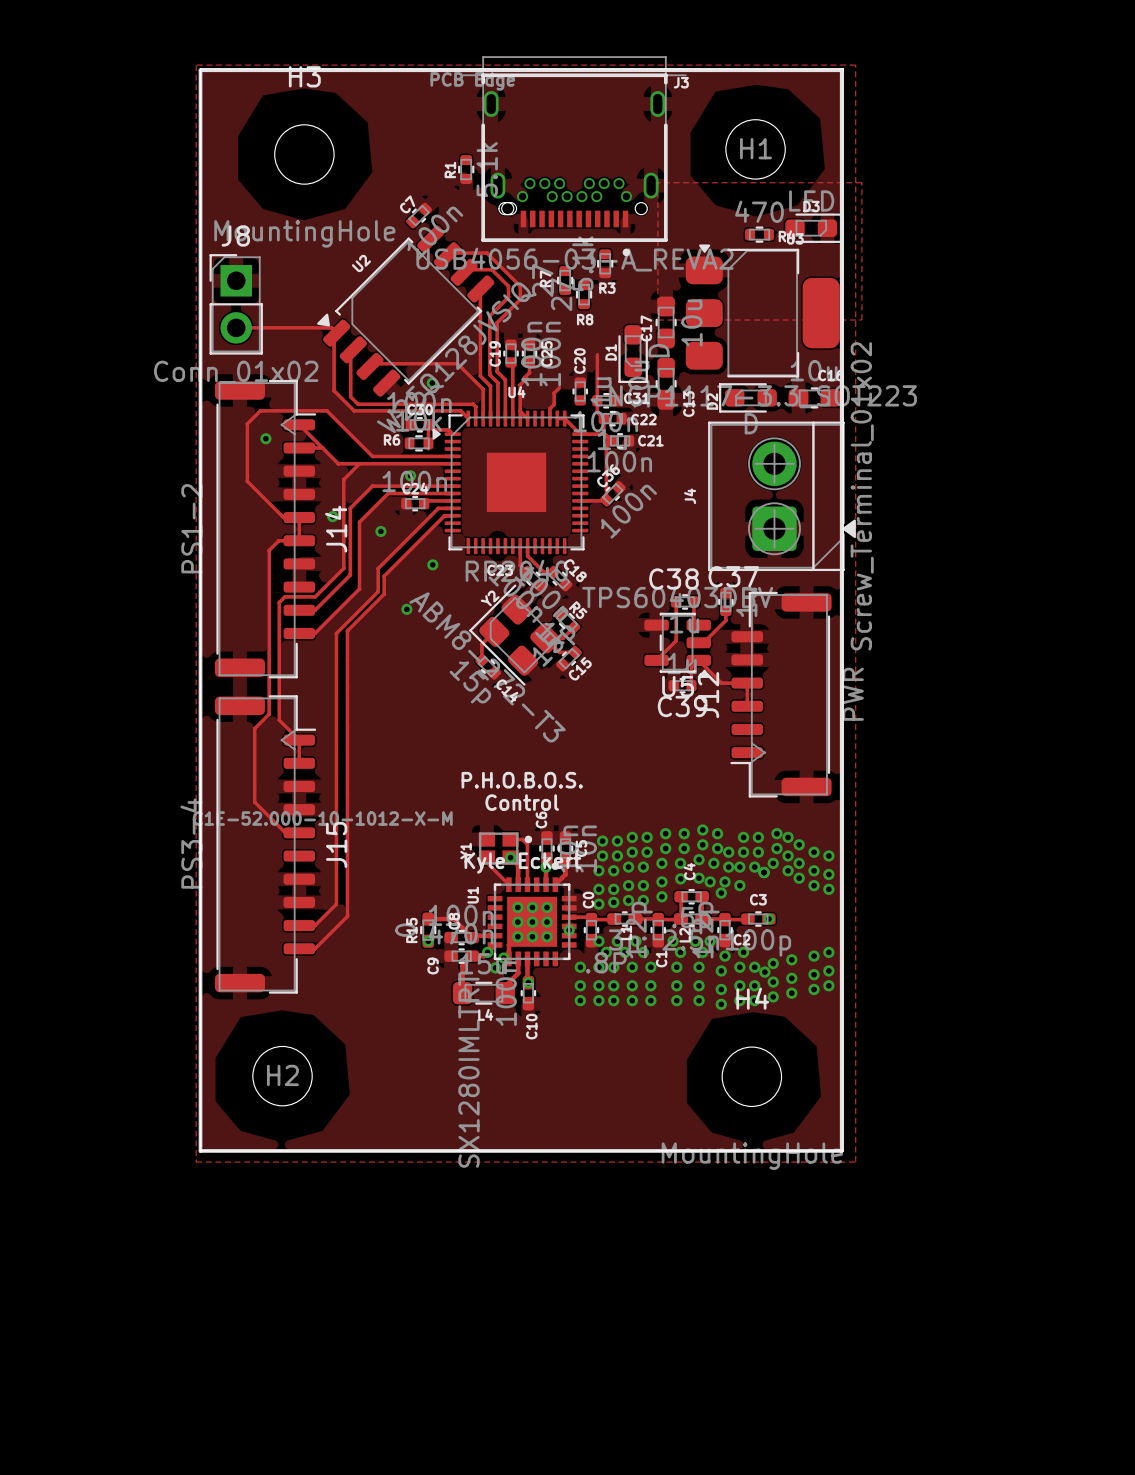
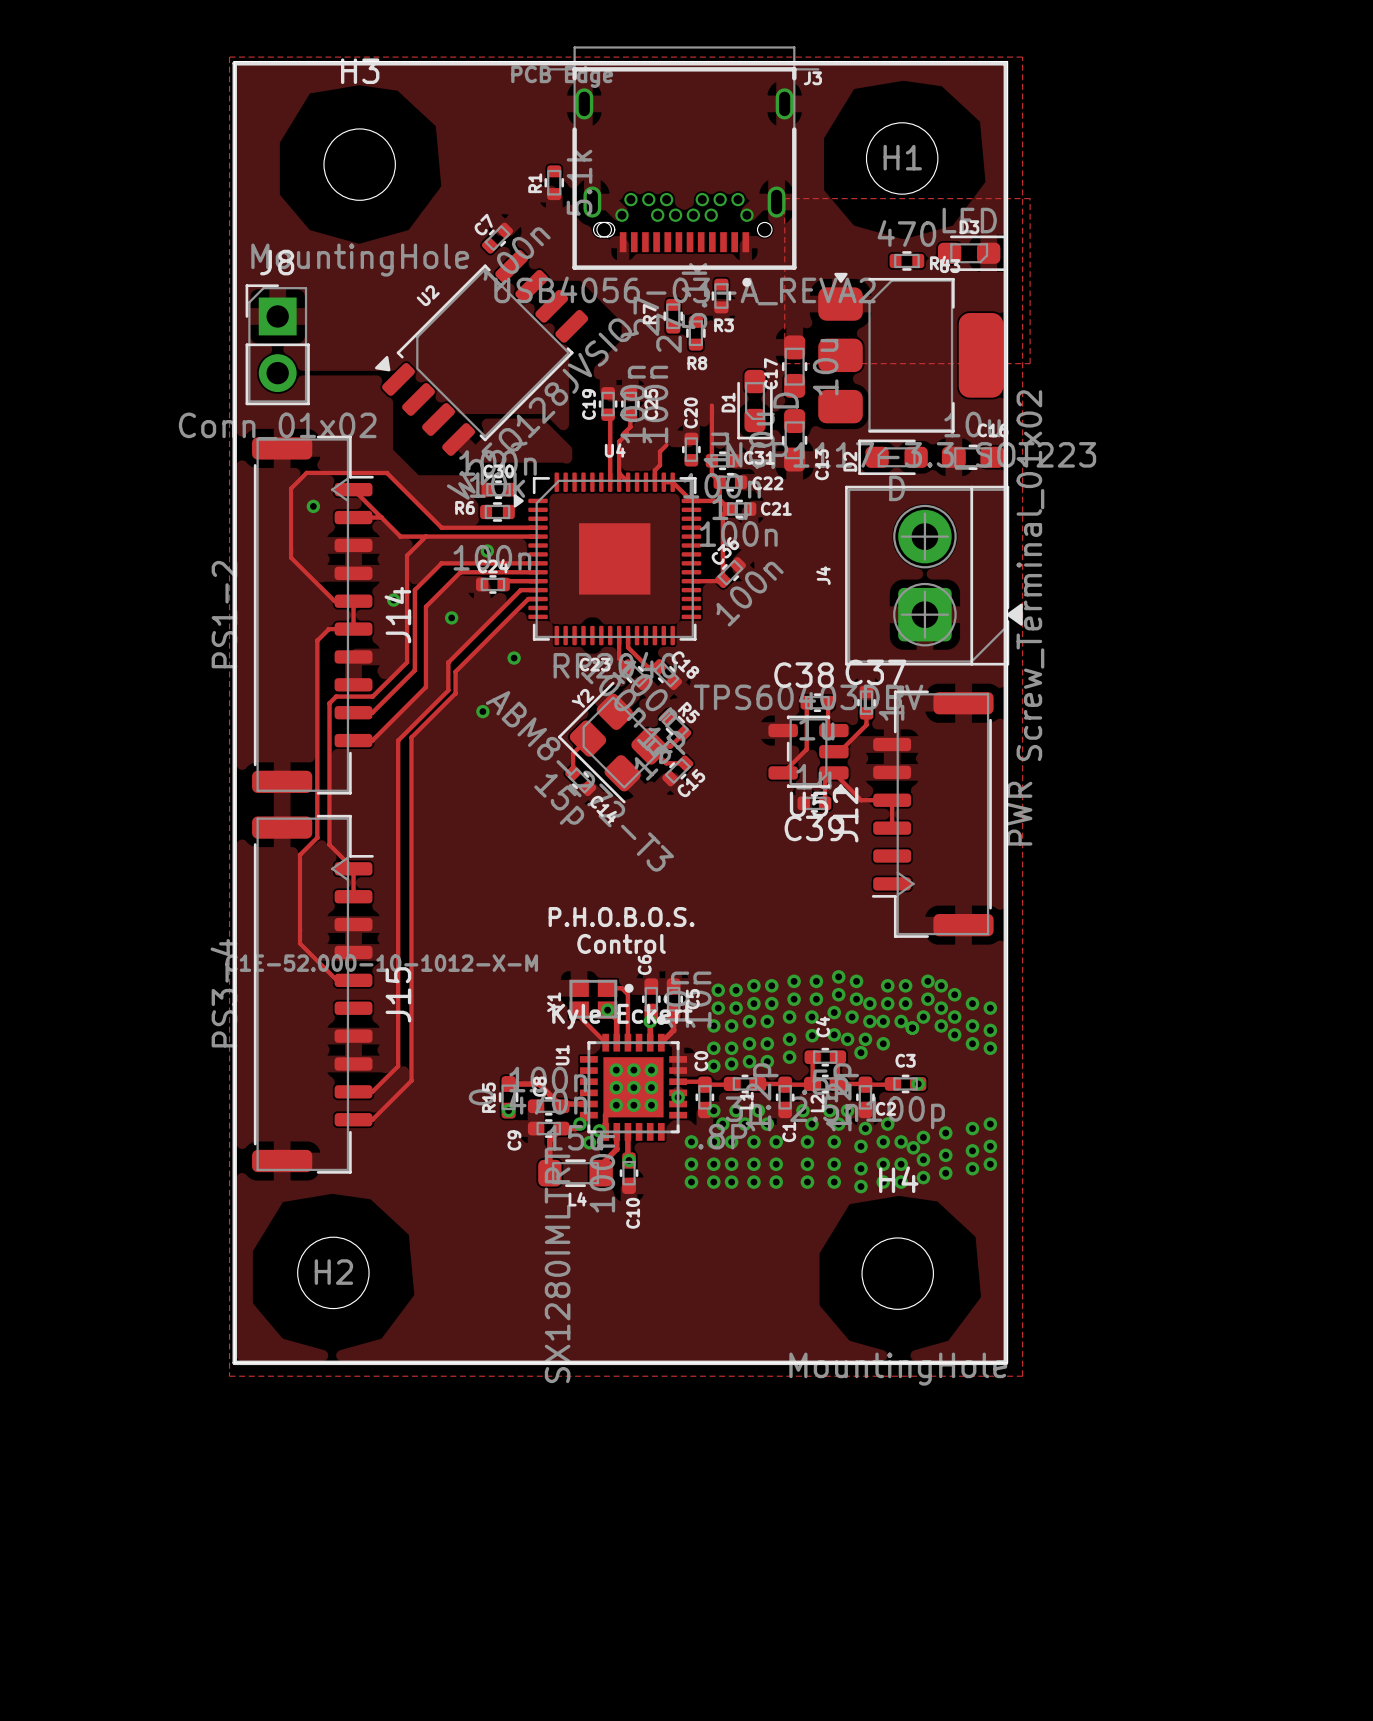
track: (447, 255) (450, 253) (487, 253) (520, 286) (520, 299) (497, 322) (497, 371) (505, 379) (505, 418) -> none
track: (464, 272) (466, 269) (491, 269) (508, 286) (508, 297) (489, 315) (489, 374) (497, 382) (497, 418) -> none
track: (480, 288) (480, 376) (490, 386) (490, 418) -> none
track: (236, 327) (331, 327) (336, 333) (334, 335) (334, 390) (354, 410) (460, 410) (468, 418) -> none
track: (353, 349) (350, 352) (350, 396) (358, 404) (473, 404) (475, 406) (475, 418) -> none
track: (370, 366) (372, 363) (457, 363) (483, 389) (483, 418) -> none
via: (432, 383) -> none
track: (452, 434) (448, 429) (433, 429) (428, 424) (428, 448) -> none

